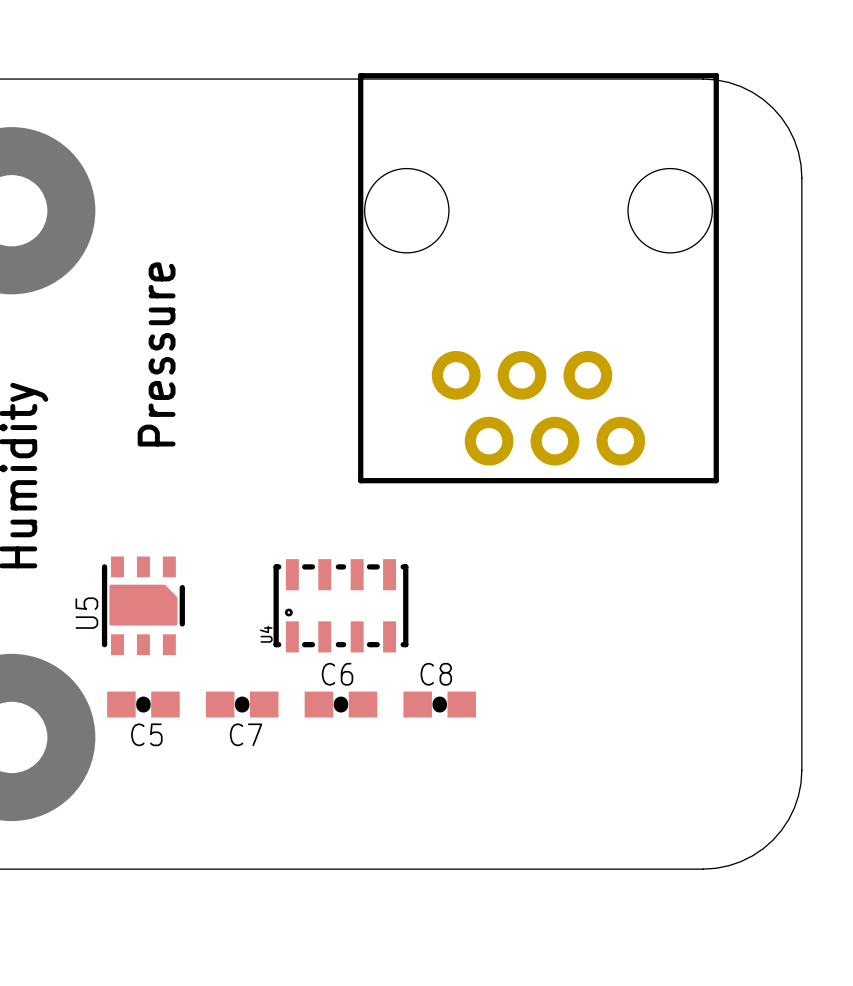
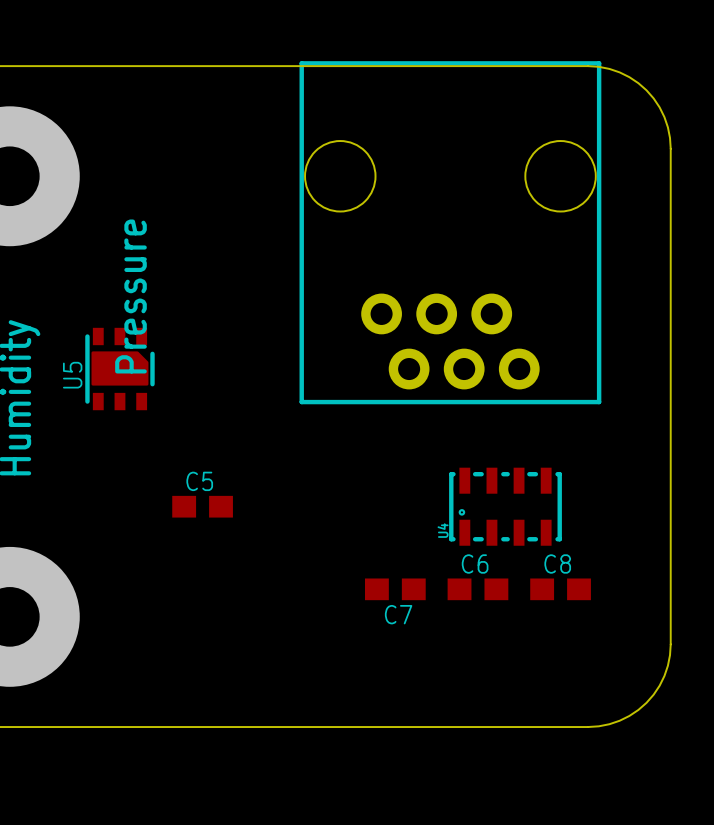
U5 position: (143, 605) -> (119, 369)
U4 position: (340, 605) -> (505, 506)
C5 footprint: [107, 691, 180, 718] -> [172, 495, 233, 518]
C7 footprint: [205, 691, 279, 718] -> [364, 578, 426, 601]
C6 footprint: [304, 691, 378, 718] -> [447, 578, 509, 601]
C8 footprint: [403, 691, 477, 718] -> [530, 578, 591, 601]
C5 name position: C5 (146, 734) -> C5 (199, 481)

